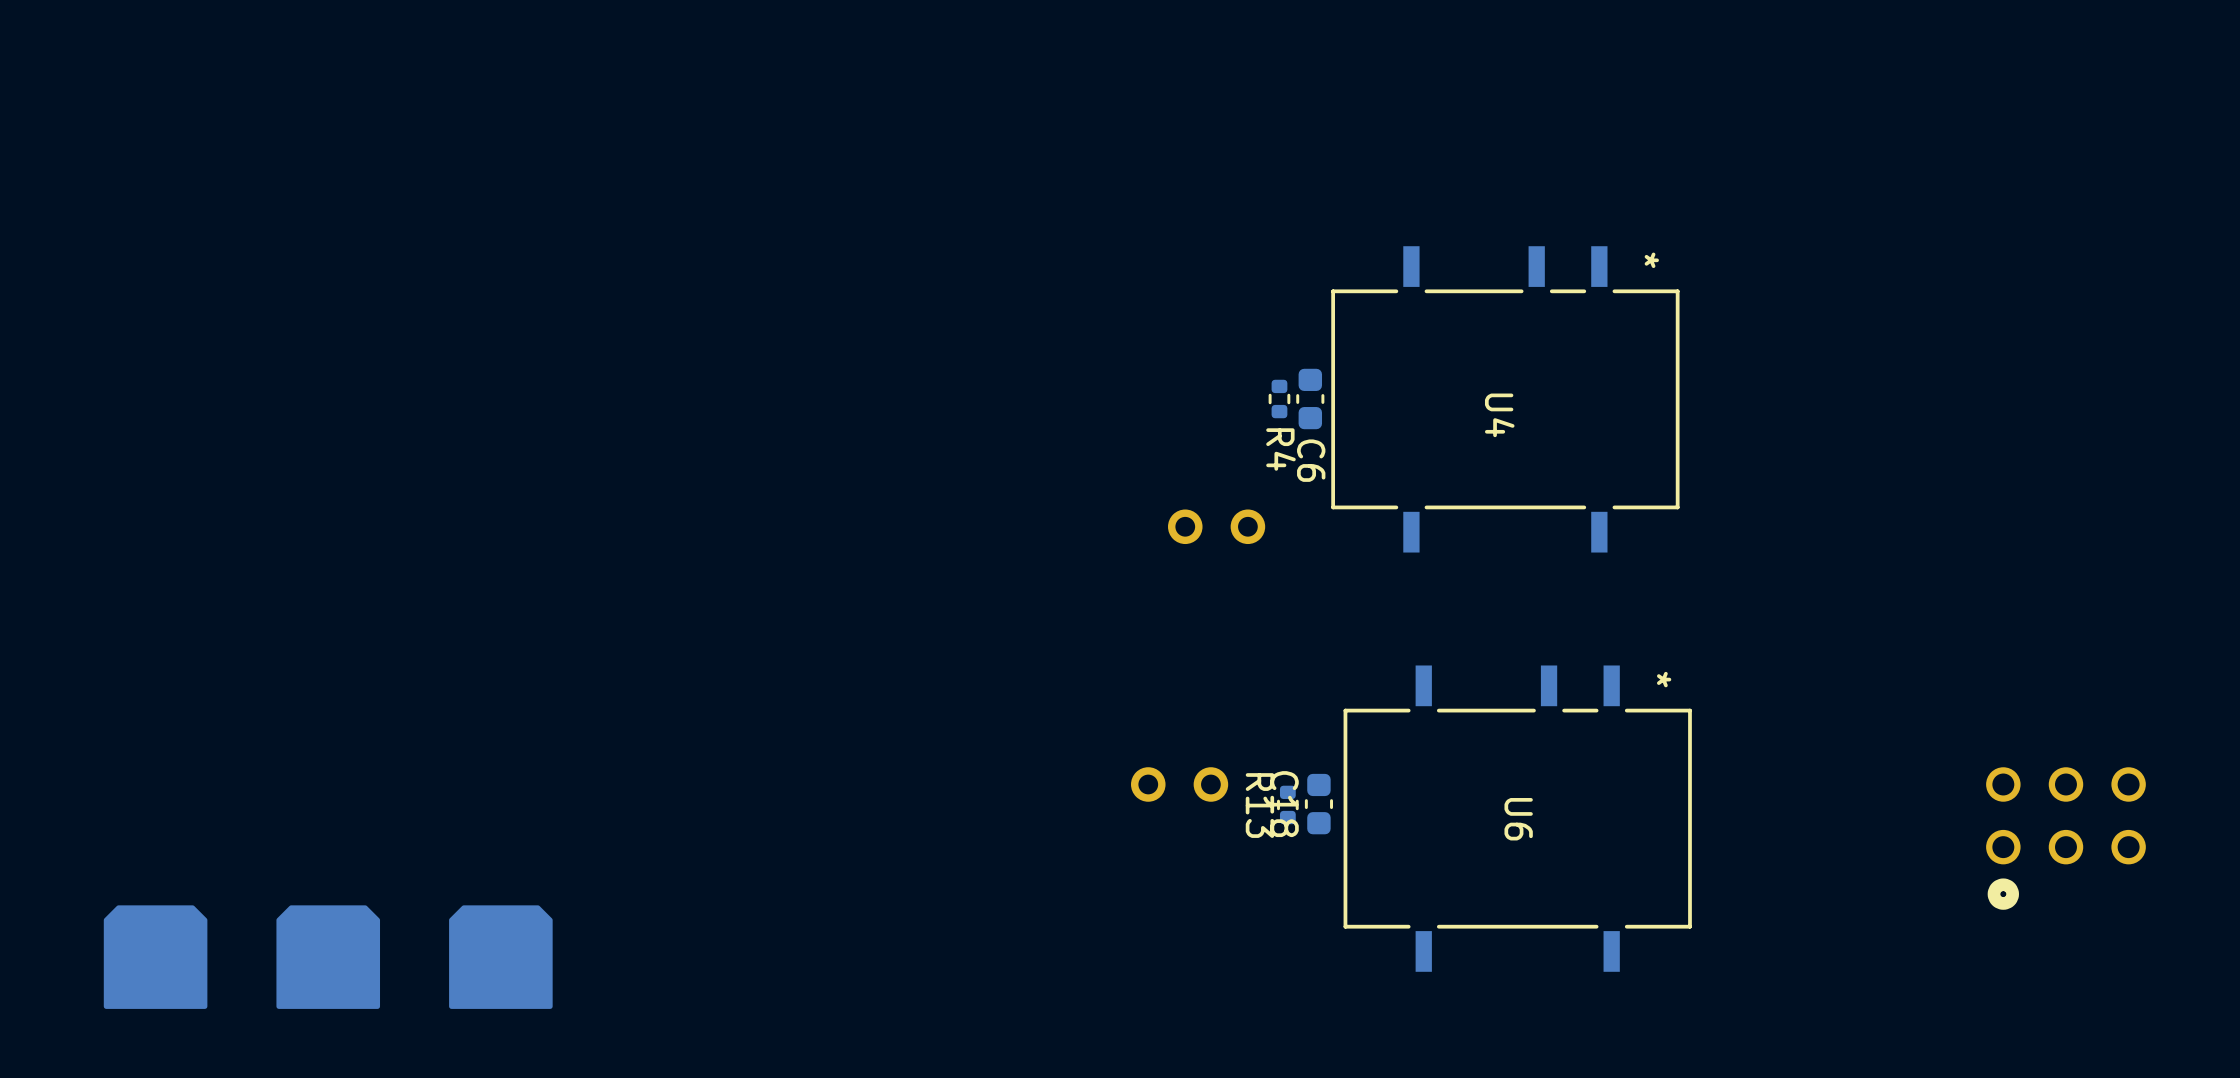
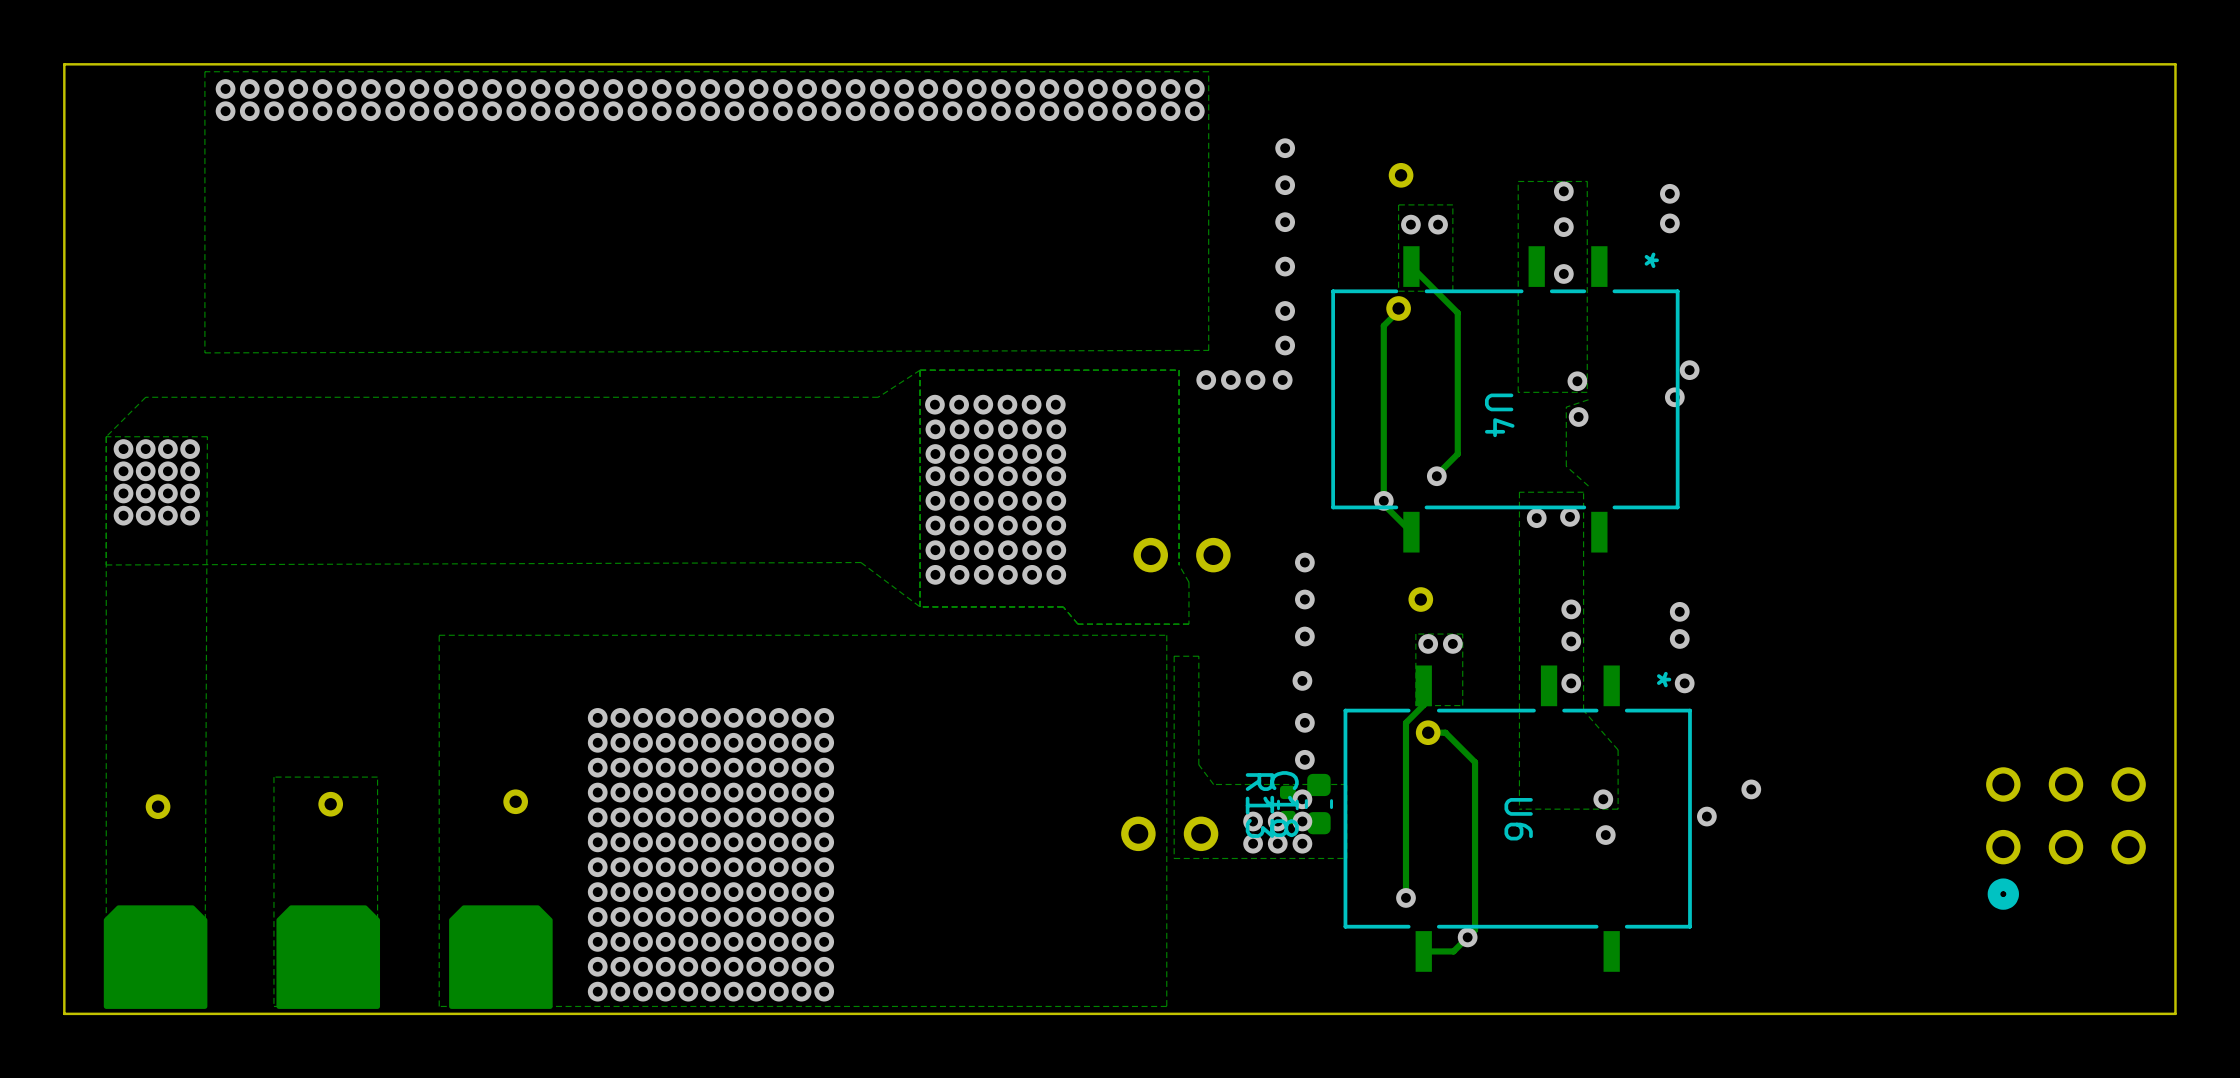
board edge: none -> (2175, 64) (64, 64) (64, 1013) (2175, 1013) (2175, 64)
zone outline: none -> (1208, 71) (1208, 350) (204, 352) (204, 71) (1208, 71)
via: none -> (225, 88)
via: none -> (249, 88)
via: none -> (274, 88)
via: none -> (298, 88)
via: none -> (322, 88)
via: none -> (346, 88)
via: none -> (370, 88)
via: none -> (395, 88)
via: none -> (419, 88)
via: none -> (443, 88)
via: none -> (467, 88)
via: none -> (492, 88)
via: none -> (516, 88)
via: none -> (540, 88)
via: none -> (564, 88)
via: none -> (589, 88)
via: none -> (613, 88)
via: none -> (637, 88)
via: none -> (661, 88)
via: none -> (685, 88)
via: none -> (710, 88)
via: none -> (734, 88)
via: none -> (758, 88)
via: none -> (782, 88)
via: none -> (807, 88)
via: none -> (831, 88)
via: none -> (855, 88)
via: none -> (879, 88)
via: none -> (904, 88)
via: none -> (928, 88)
via: none -> (952, 88)
via: none -> (976, 88)
via: none -> (1000, 88)
via: none -> (1025, 88)
via: none -> (1049, 88)
via: none -> (1073, 88)
via: none -> (1097, 88)
via: none -> (1122, 88)
via: none -> (1146, 88)
via: none -> (1170, 88)
via: none -> (1194, 88)
via: none -> (225, 111)
via: none -> (249, 111)
via: none -> (274, 111)
via: none -> (298, 111)
via: none -> (322, 111)
via: none -> (346, 111)
via: none -> (370, 111)
via: none -> (395, 111)
via: none -> (419, 111)
via: none -> (443, 111)
via: none -> (467, 111)
via: none -> (492, 111)
via: none -> (516, 111)
via: none -> (540, 111)
via: none -> (564, 111)
via: none -> (589, 111)
via: none -> (613, 111)
via: none -> (637, 111)
via: none -> (661, 111)
via: none -> (685, 111)
via: none -> (710, 111)
via: none -> (734, 111)
via: none -> (758, 111)
via: none -> (782, 111)
via: none -> (807, 111)
via: none -> (831, 111)
via: none -> (855, 111)
via: none -> (879, 111)
via: none -> (904, 111)
via: none -> (928, 111)
via: none -> (952, 111)
via: none -> (976, 111)
via: none -> (1000, 111)
via: none -> (1025, 111)
via: none -> (1049, 111)
via: none -> (1073, 111)
via: none -> (1097, 111)
via: none -> (1122, 111)
via: none -> (1146, 111)
via: none -> (1170, 111)
via: none -> (1194, 111)
via: none -> (1285, 148)
part: none -> (1401, 175)
zone outline: none -> (1587, 181) (1587, 392) (1518, 392) (1518, 181) (1587, 181)
via: none -> (1285, 185)
via: none -> (1563, 191)
via: none -> (1669, 193)
zone outline: none -> (1452, 204) (1452, 291) (1398, 291) (1398, 204) (1452, 204)
via: none -> (1285, 222)
via: none -> (1669, 223)
via: none -> (1410, 224)
via: none -> (1438, 224)
via: none -> (1563, 227)
via: none -> (1285, 266)
track: none -> (1411, 266) (1457, 312) (1457, 454) (1436, 476)
via: none -> (1563, 273)
part: none -> (1398, 308)
via: none -> (1285, 310)
track: none -> (1398, 310) (1383, 325) (1383, 504) (1411, 532)
via: none -> (1285, 345)
zone outline: none -> (920, 370) (920, 606)
zone outline: none -> (920, 370) (1179, 370) (1179, 564) (1188, 582) (1188, 624) (1077, 624) (1063, 606) (920, 606)
zone outline: none -> (920, 370) (878, 397) (145, 397) (106, 436)
via: none -> (1689, 370)
via: none -> (1206, 380)
via: none -> (1230, 380)
via: none -> (1255, 380)
via: none -> (1282, 380)
via: none -> (1577, 381)
via: none -> (1674, 397)
R4: (1279, 399) -> none
C6: (1310, 399) -> none
zone outline: none -> (1588, 399) (1566, 407) (1566, 466) (1588, 486)
via: none -> (934, 404)
via: none -> (959, 404)
via: none -> (983, 404)
via: none -> (1007, 404)
via: none -> (1031, 404)
via: none -> (1055, 404)
via: none -> (1578, 417)
via: none -> (935, 429)
via: none -> (959, 429)
via: none -> (983, 429)
via: none -> (1007, 429)
via: none -> (1032, 429)
via: none -> (1056, 429)
zone outline: none -> (106, 436) (207, 436) (204, 1006) (106, 1006) (106, 436)
via: none -> (123, 449)
via: none -> (145, 449)
via: none -> (167, 449)
via: none -> (190, 449)
via: none -> (935, 454)
via: none -> (959, 454)
via: none -> (983, 454)
via: none -> (1007, 454)
via: none -> (1032, 454)
via: none -> (1056, 454)
via: none -> (123, 471)
via: none -> (145, 471)
via: none -> (167, 471)
via: none -> (190, 471)
via: none -> (935, 476)
via: none -> (959, 476)
via: none -> (983, 476)
via: none -> (1007, 476)
via: none -> (1032, 476)
via: none -> (1056, 476)
via: none -> (1436, 476)
zone outline: none -> (1583, 492) (1583, 710) (1618, 749) (1618, 809) (1519, 809) (1519, 492) (1583, 492)
via: none -> (123, 493)
via: none -> (145, 493)
via: none -> (167, 493)
via: none -> (190, 493)
via: none -> (935, 500)
via: none -> (959, 500)
via: none -> (983, 500)
via: none -> (1007, 500)
via: none -> (1032, 500)
via: none -> (1056, 500)
via: none -> (1383, 500)
via: none -> (123, 515)
via: none -> (145, 515)
via: none -> (167, 515)
via: none -> (190, 515)
via: none -> (1570, 516)
via: none -> (1536, 518)
via: none -> (935, 525)
via: none -> (959, 525)
via: none -> (983, 525)
via: none -> (1007, 525)
via: none -> (1032, 525)
via: none -> (1056, 525)
part position: (1216, 526) -> (1182, 555)
via: none -> (935, 550)
via: none -> (959, 550)
via: none -> (983, 550)
via: none -> (1007, 550)
via: none -> (1032, 550)
via: none -> (1056, 550)
via: none -> (1304, 562)
zone outline: none -> (106, 564) (860, 562) (920, 606)
via: none -> (935, 574)
via: none -> (959, 574)
via: none -> (983, 574)
via: none -> (1007, 574)
via: none -> (1032, 574)
via: none -> (1056, 574)
via: none -> (1304, 599)
part: none -> (1420, 599)
via: none -> (1571, 609)
via: none -> (1679, 611)
zone outline: none -> (1462, 634) (1462, 705) (1415, 705) (1415, 634) (1462, 634)
zone outline: none -> (1166, 635) (439, 635) (439, 1006) (1166, 1006) (1166, 635)
via: none -> (1304, 636)
via: none -> (1679, 638)
via: none -> (1571, 641)
via: none -> (1428, 643)
via: none -> (1452, 643)
zone outline: none -> (1198, 656) (1198, 764) (1213, 784) (1346, 784) (1346, 858) (1174, 858) (1174, 656) (1198, 656)
via: none -> (1302, 680)
via: none -> (1571, 683)
via: none -> (1684, 683)
track: none -> (1423, 685) (1423, 705) (1405, 722) (1405, 897)
via: none -> (597, 717)
via: none -> (620, 717)
via: none -> (643, 717)
via: none -> (665, 717)
via: none -> (688, 717)
via: none -> (710, 717)
via: none -> (733, 717)
via: none -> (756, 717)
via: none -> (778, 717)
via: none -> (801, 717)
via: none -> (824, 717)
via: none -> (1304, 722)
track: none -> (1428, 732) (1445, 732) (1475, 762) (1475, 930) (1453, 951) (1423, 951)
part: none -> (1428, 732)
via: none -> (597, 742)
via: none -> (620, 742)
via: none -> (643, 742)
via: none -> (665, 742)
via: none -> (688, 742)
via: none -> (710, 742)
via: none -> (733, 742)
via: none -> (756, 742)
via: none -> (778, 742)
via: none -> (801, 742)
via: none -> (824, 742)
via: none -> (1304, 759)
via: none -> (597, 767)
via: none -> (620, 767)
via: none -> (643, 767)
via: none -> (665, 767)
via: none -> (688, 767)
via: none -> (710, 767)
via: none -> (733, 767)
via: none -> (756, 767)
via: none -> (778, 767)
via: none -> (801, 767)
via: none -> (824, 767)
zone outline: none -> (377, 777) (377, 1006) (273, 1006) (273, 777) (377, 777)
part position: (1179, 784) -> (1169, 833)
via: none -> (1751, 789)
via: none -> (597, 792)
via: none -> (620, 792)
via: none -> (643, 792)
via: none -> (665, 792)
via: none -> (688, 792)
via: none -> (710, 792)
via: none -> (733, 792)
via: none -> (756, 792)
via: none -> (778, 792)
via: none -> (801, 792)
via: none -> (824, 792)
via: none -> (1302, 799)
via: none -> (1603, 799)
part: none -> (515, 801)
part: none -> (330, 804)
part: none -> (158, 806)
via: none -> (1706, 816)
via: none -> (597, 817)
via: none -> (620, 817)
via: none -> (643, 817)
via: none -> (665, 817)
via: none -> (688, 817)
via: none -> (710, 817)
via: none -> (733, 817)
via: none -> (756, 817)
via: none -> (778, 817)
via: none -> (801, 817)
via: none -> (824, 817)
via: none -> (1253, 821)
via: none -> (1277, 821)
via: none -> (1302, 821)
via: none -> (1605, 835)
via: none -> (597, 842)
via: none -> (620, 842)
via: none -> (643, 842)
via: none -> (665, 842)
via: none -> (688, 842)
via: none -> (710, 842)
via: none -> (733, 842)
via: none -> (756, 842)
via: none -> (778, 842)
via: none -> (801, 842)
via: none -> (824, 842)
via: none -> (1253, 843)
via: none -> (1277, 843)
via: none -> (1302, 843)
via: none -> (597, 867)
via: none -> (620, 867)
via: none -> (643, 867)
via: none -> (665, 867)
via: none -> (688, 867)
via: none -> (710, 867)
via: none -> (733, 867)
via: none -> (756, 867)
via: none -> (778, 867)
via: none -> (801, 867)
via: none -> (824, 867)
via: none -> (597, 892)
via: none -> (620, 892)
via: none -> (643, 892)
via: none -> (665, 892)
via: none -> (688, 892)
via: none -> (710, 892)
via: none -> (733, 892)
via: none -> (756, 892)
via: none -> (778, 892)
via: none -> (801, 892)
via: none -> (824, 892)
via: none -> (1405, 897)
via: none -> (597, 917)
via: none -> (620, 917)
via: none -> (643, 917)
via: none -> (665, 917)
via: none -> (688, 917)
via: none -> (710, 917)
via: none -> (733, 917)
via: none -> (756, 917)
via: none -> (778, 917)
via: none -> (801, 917)
via: none -> (824, 917)
via: none -> (1467, 937)
via: none -> (597, 941)
via: none -> (620, 941)
via: none -> (643, 941)
via: none -> (665, 941)
via: none -> (688, 941)
via: none -> (710, 941)
via: none -> (733, 941)
via: none -> (756, 941)
via: none -> (778, 941)
via: none -> (801, 941)
via: none -> (824, 941)
via: none -> (597, 966)
via: none -> (620, 966)
via: none -> (643, 966)
via: none -> (665, 966)
via: none -> (688, 966)
via: none -> (710, 966)
via: none -> (733, 966)
via: none -> (756, 966)
via: none -> (778, 966)
via: none -> (801, 966)
via: none -> (824, 966)
via: none -> (597, 991)
via: none -> (620, 991)
via: none -> (643, 991)
via: none -> (665, 991)
via: none -> (688, 991)
via: none -> (710, 991)
via: none -> (733, 991)
via: none -> (756, 991)
via: none -> (778, 991)
via: none -> (801, 991)
via: none -> (824, 991)

